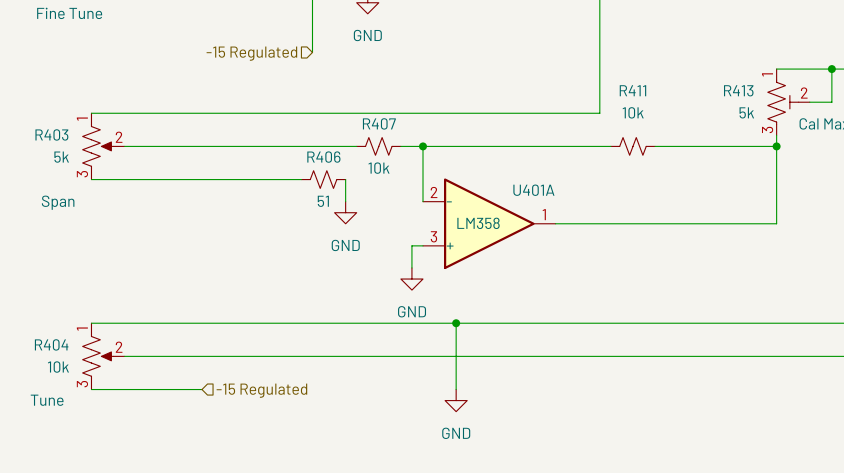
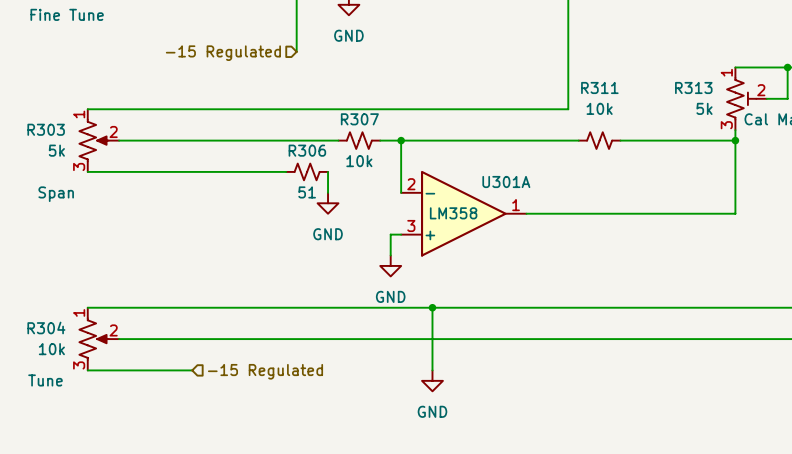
R411 name: R411 (632, 90) -> R311 (599, 87)
R413 name: R413 (738, 90) -> R313 (693, 87)
R407 name: R407 (379, 123) -> R307 (359, 119)
R403 name: R403 (51, 134) -> R303 (46, 129)
R406 name: R406 (323, 157) -> R306 (307, 150)
U401A name: U401A (533, 190) -> U301A (506, 182)
R404 name: R404 (51, 344) -> R304 (46, 327)

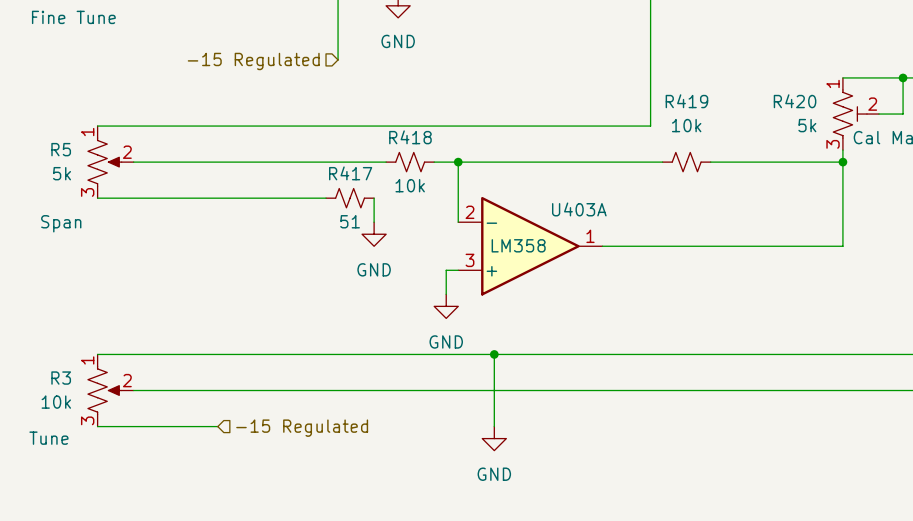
R311 name: R311 (599, 87) -> R419 (686, 101)
R313 name: R313 (693, 87) -> R420 (795, 101)
R307 name: R307 (359, 119) -> R418 (410, 137)
R303 name: R303 (46, 129) -> R5 (61, 149)
R306 name: R306 (307, 150) -> R417 (350, 173)
U301A name: U301A (506, 182) -> U403A (579, 209)
R304 name: R304 (46, 327) -> R3 (61, 378)

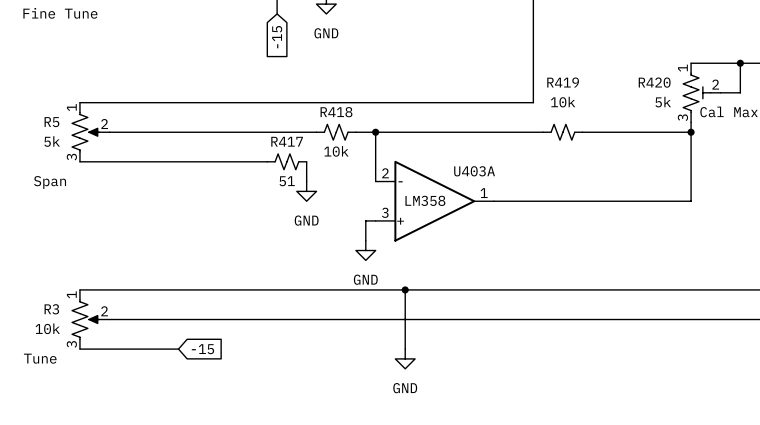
wire: (338, 17) (338, 59) -> none
global label: none -> -15 (277, 37)
hierarchical label: -15 Regulated (253, 61) -> none
global label: none -> -15 (202, 349)
hierarchical label: -15 Regulated (302, 428) -> none

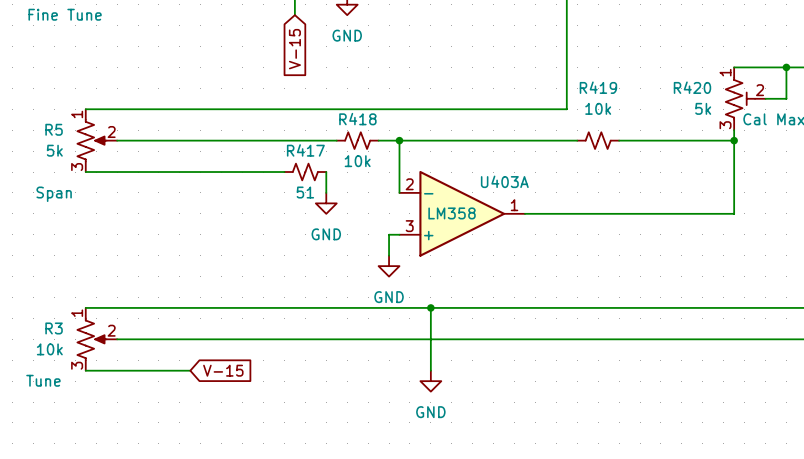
global label: -15 (277, 37) -> V-15 (294, 49)
global label: -15 (202, 349) -> V-15 (223, 370)

